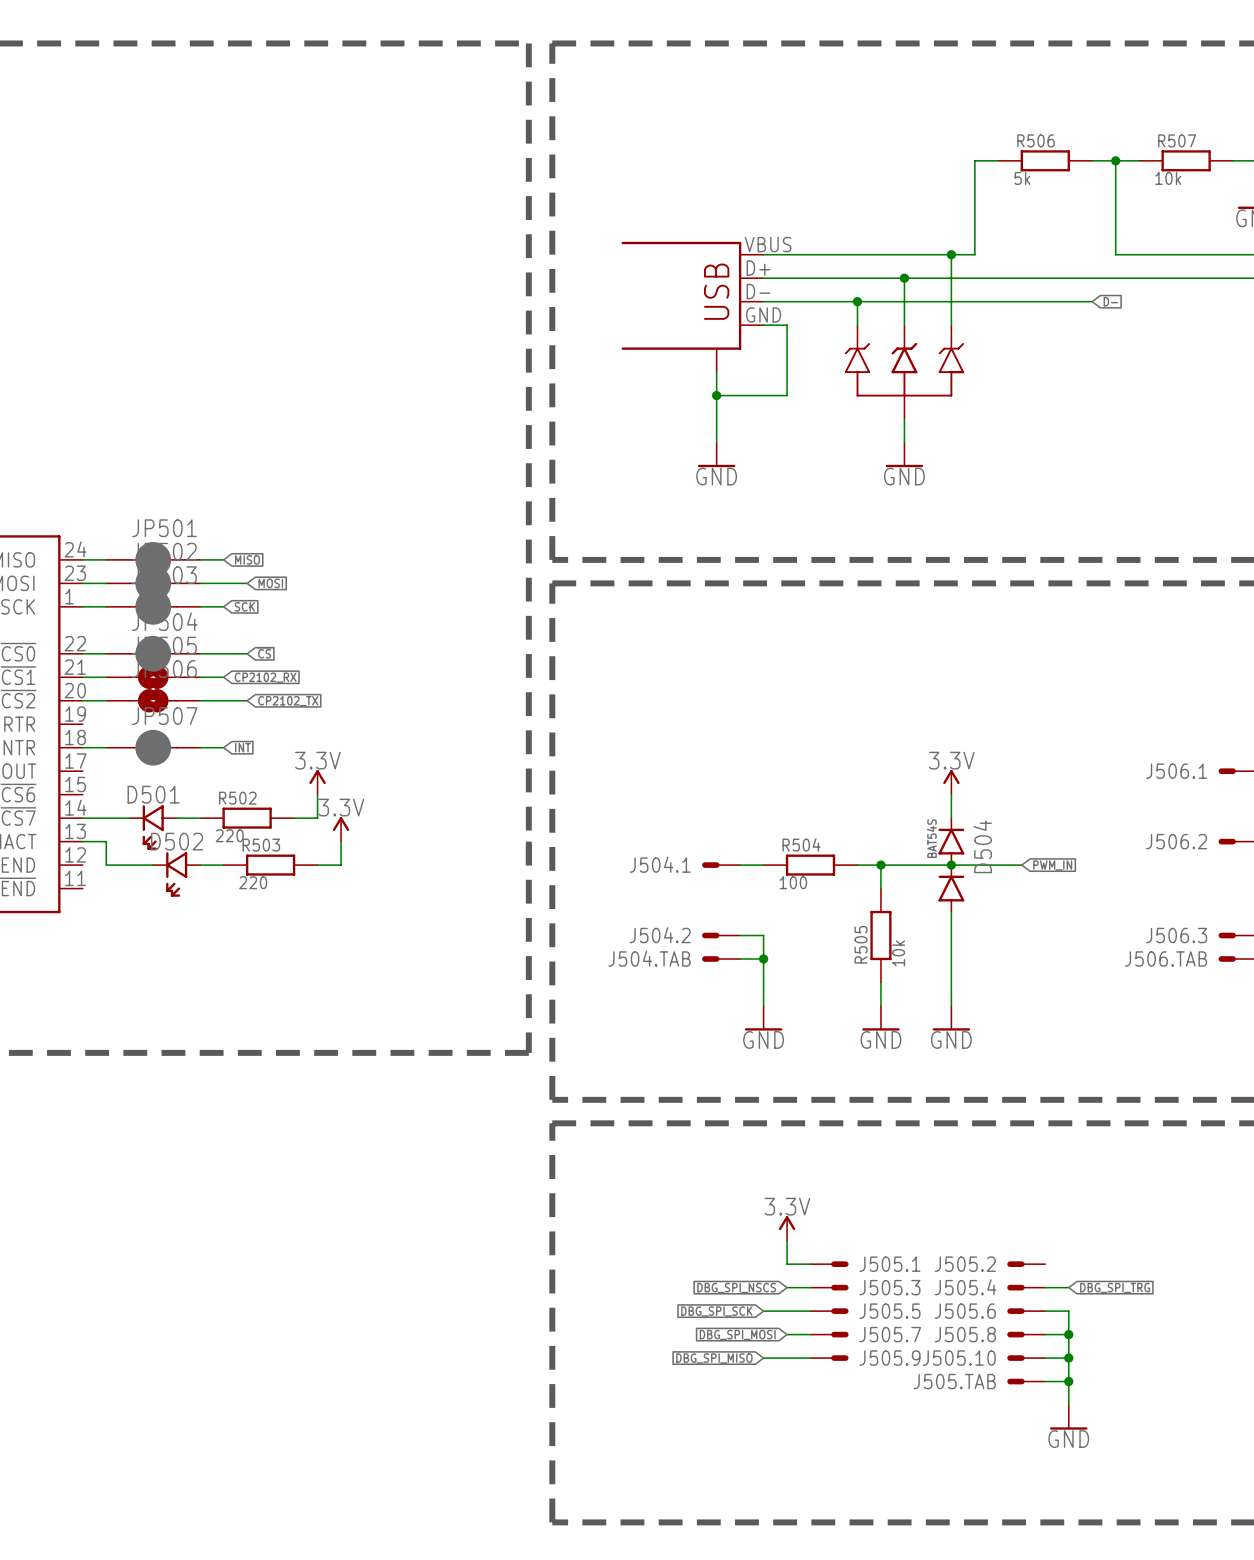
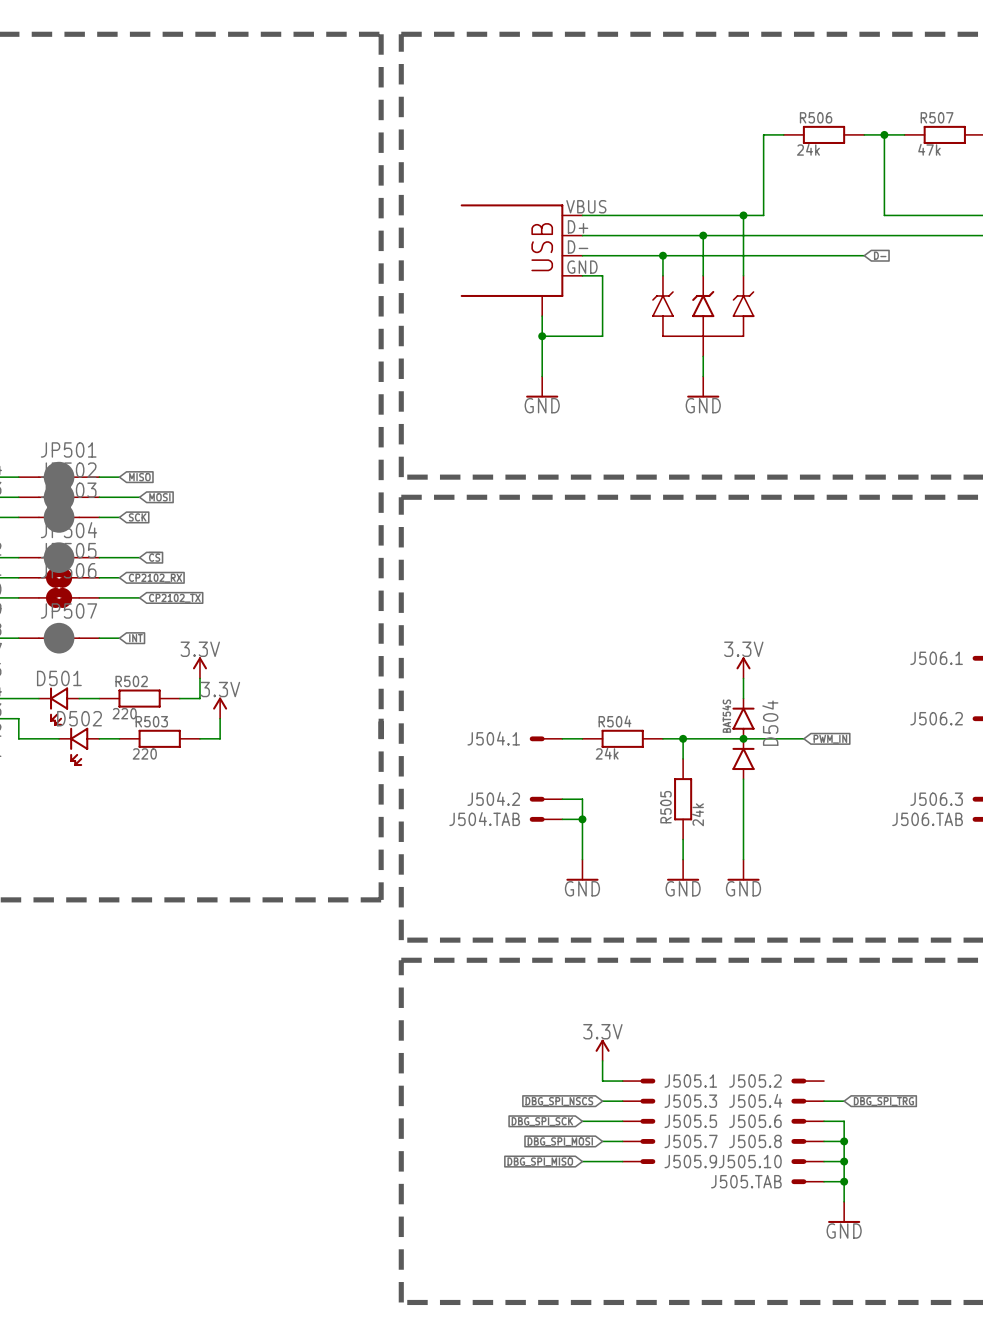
R506 value: 5k (1022, 178) -> 24k (808, 149)
R507 value: 10k (1168, 178) -> 47k (929, 149)
R504 value: 100 (793, 882) -> 24k (607, 753)
R505 value: 10k (898, 953) -> 24k (697, 814)

